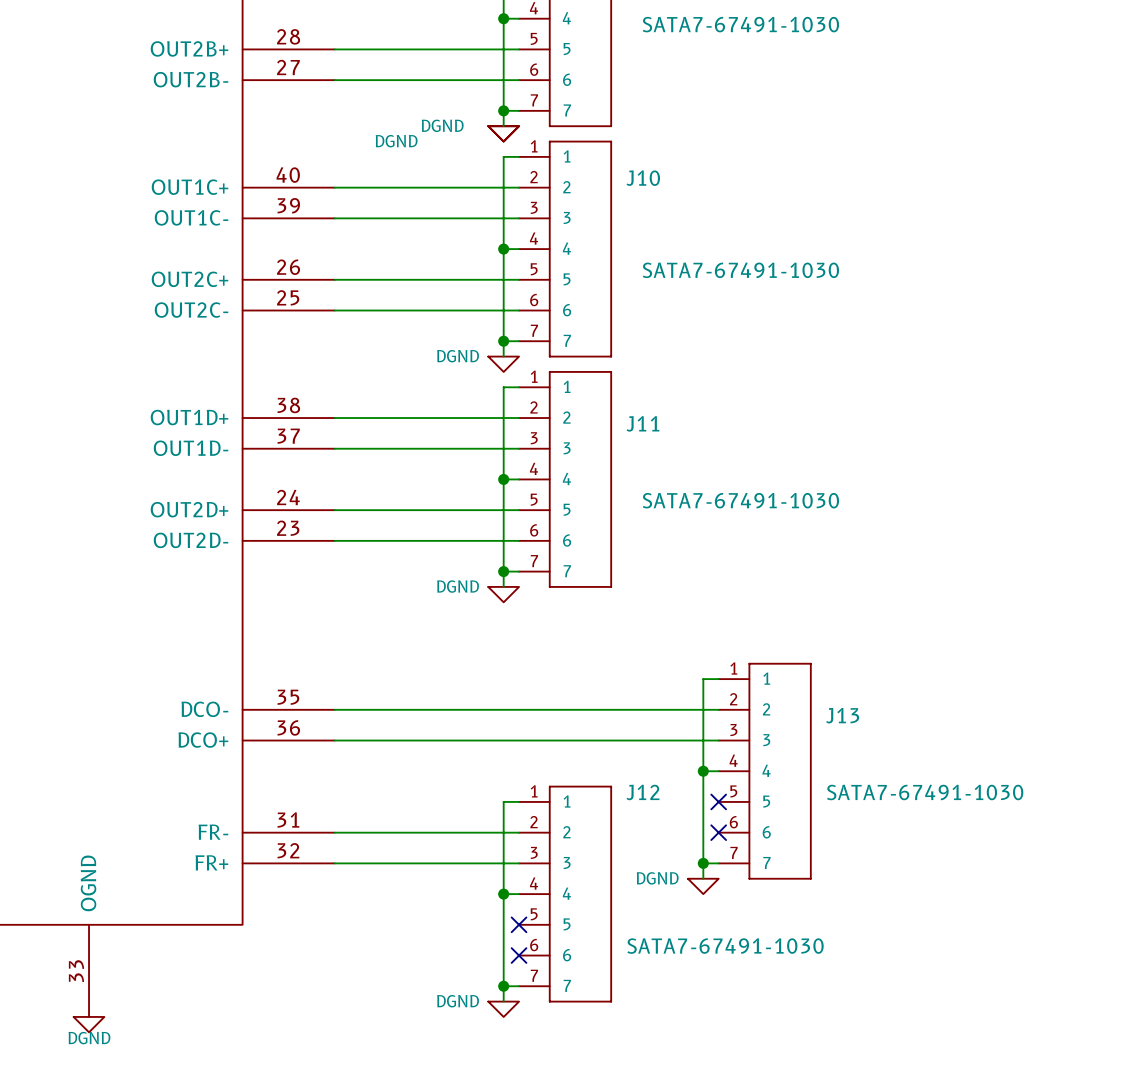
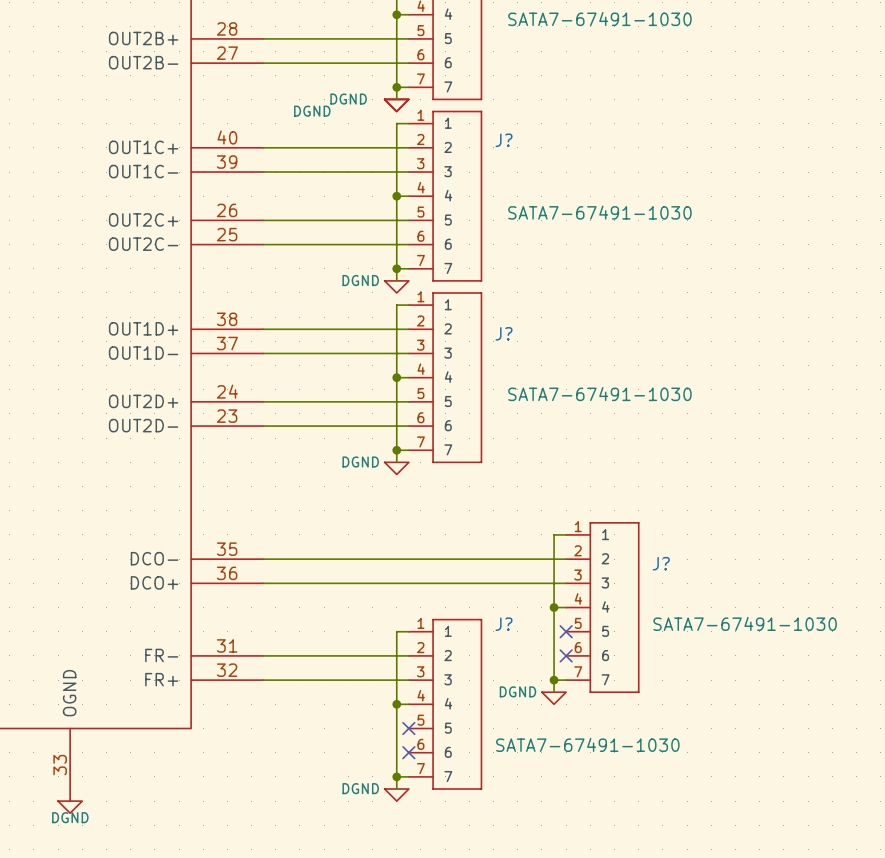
J10 name: J10 (643, 178) -> J? (504, 140)
J11 name: J11 (642, 423) -> J? (504, 333)
J13 name: J13 (842, 715) -> J? (661, 563)
J12 name: J12 (642, 792) -> J? (504, 624)

